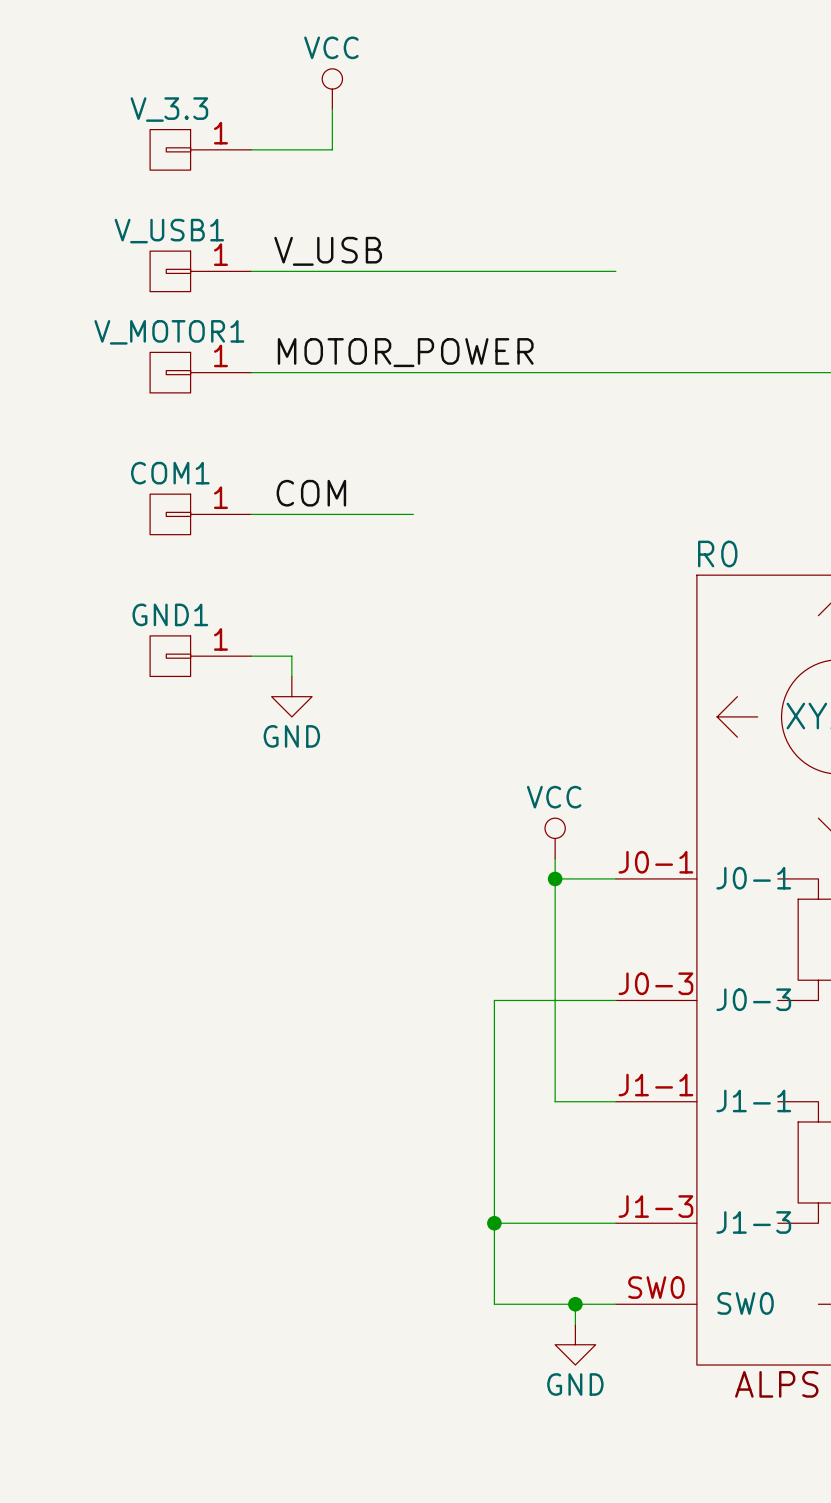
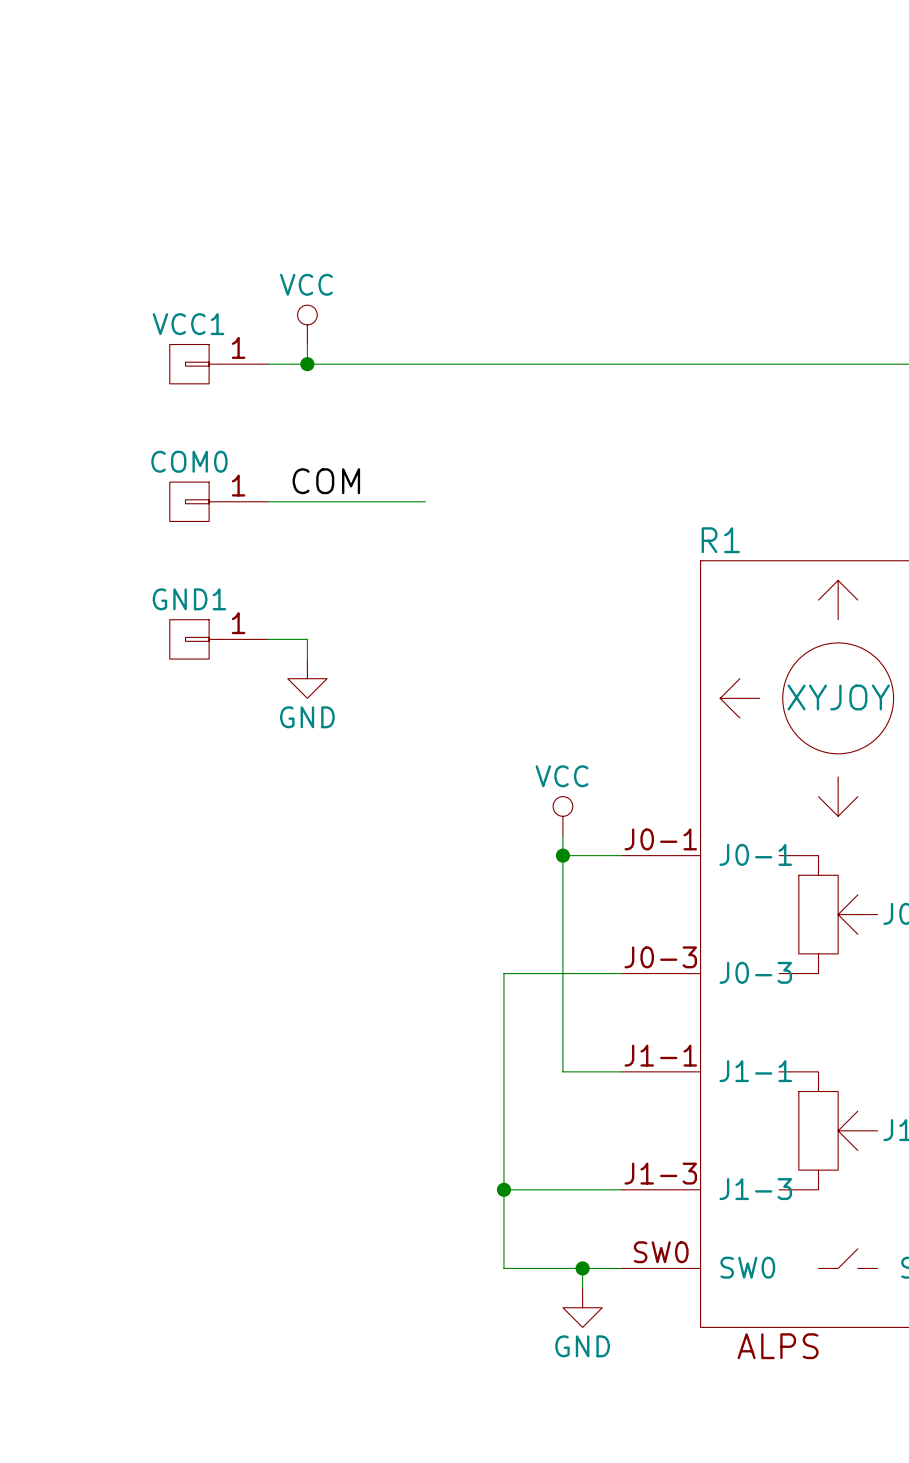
power symbol position: VCC (332, 89) -> VCC (307, 324)
wire: (332, 109) (332, 149) (251, 149) -> none
V_3.3: (200, 149) -> none
label: V_USB (328, 251) -> none
V_USB1: (200, 271) -> none
wire: (251, 271) (615, 271) -> none
V_MOTOR1 name: V_MOTOR1 (169, 332) -> VCC1 (188, 324)
wire: none -> (307, 344) (307, 364)
label: MOTOR_POWER (405, 352) -> none
junction: none -> (307, 364)
COM1 name: COM1 (170, 473) -> COM0 (189, 461)
R0 name: R0 (717, 554) -> R1 (720, 540)

